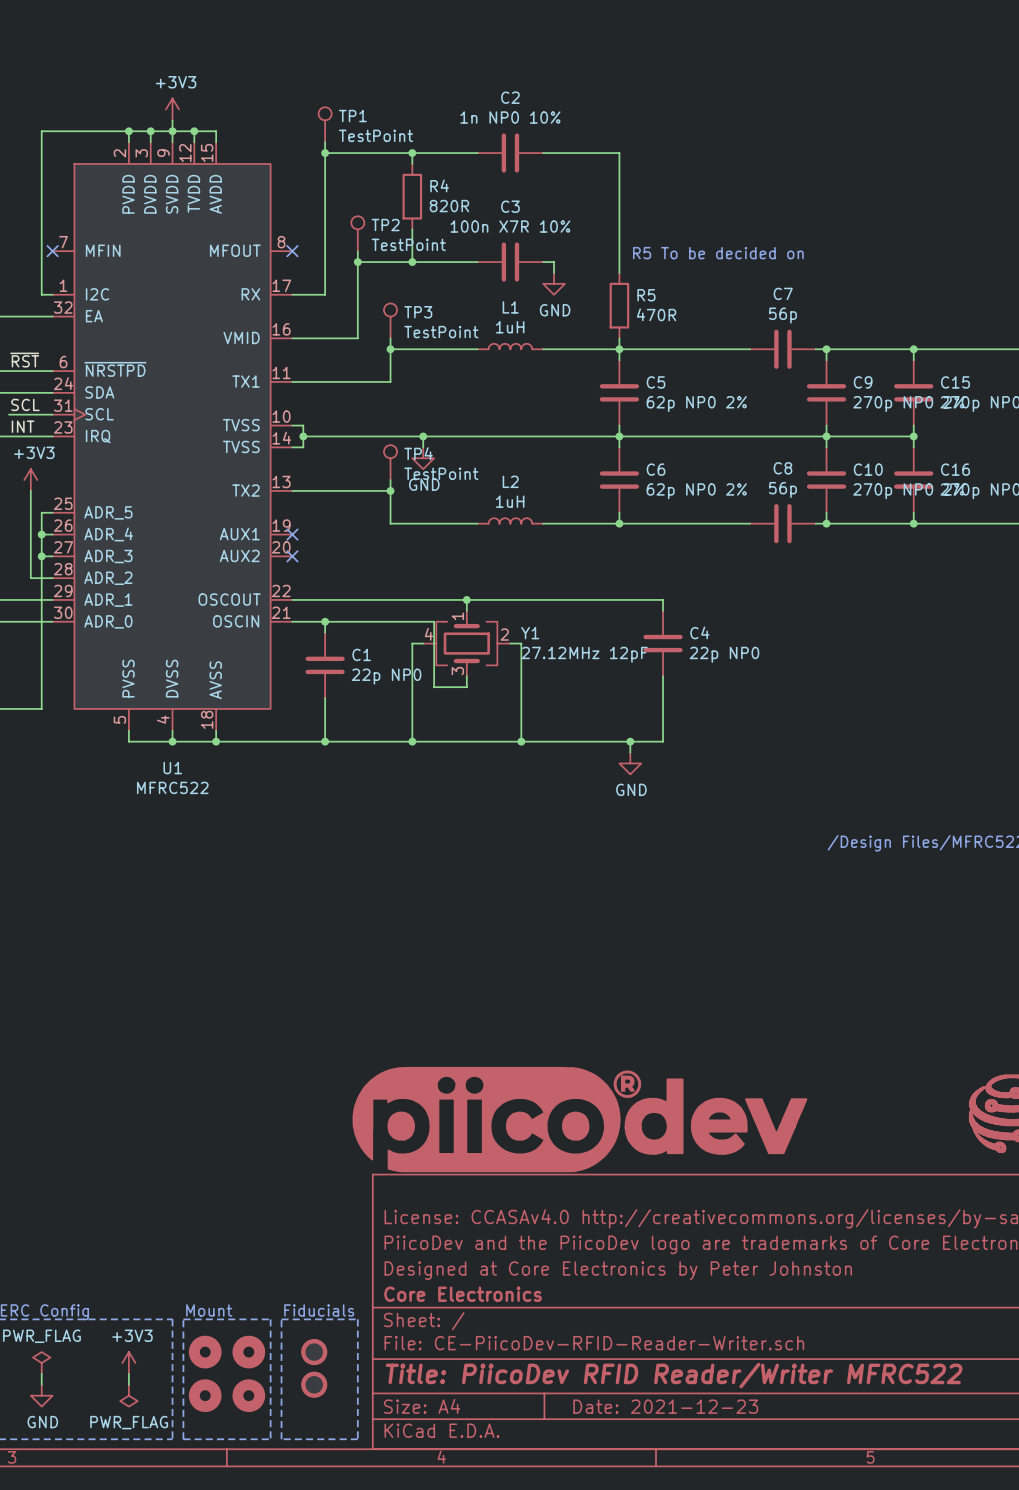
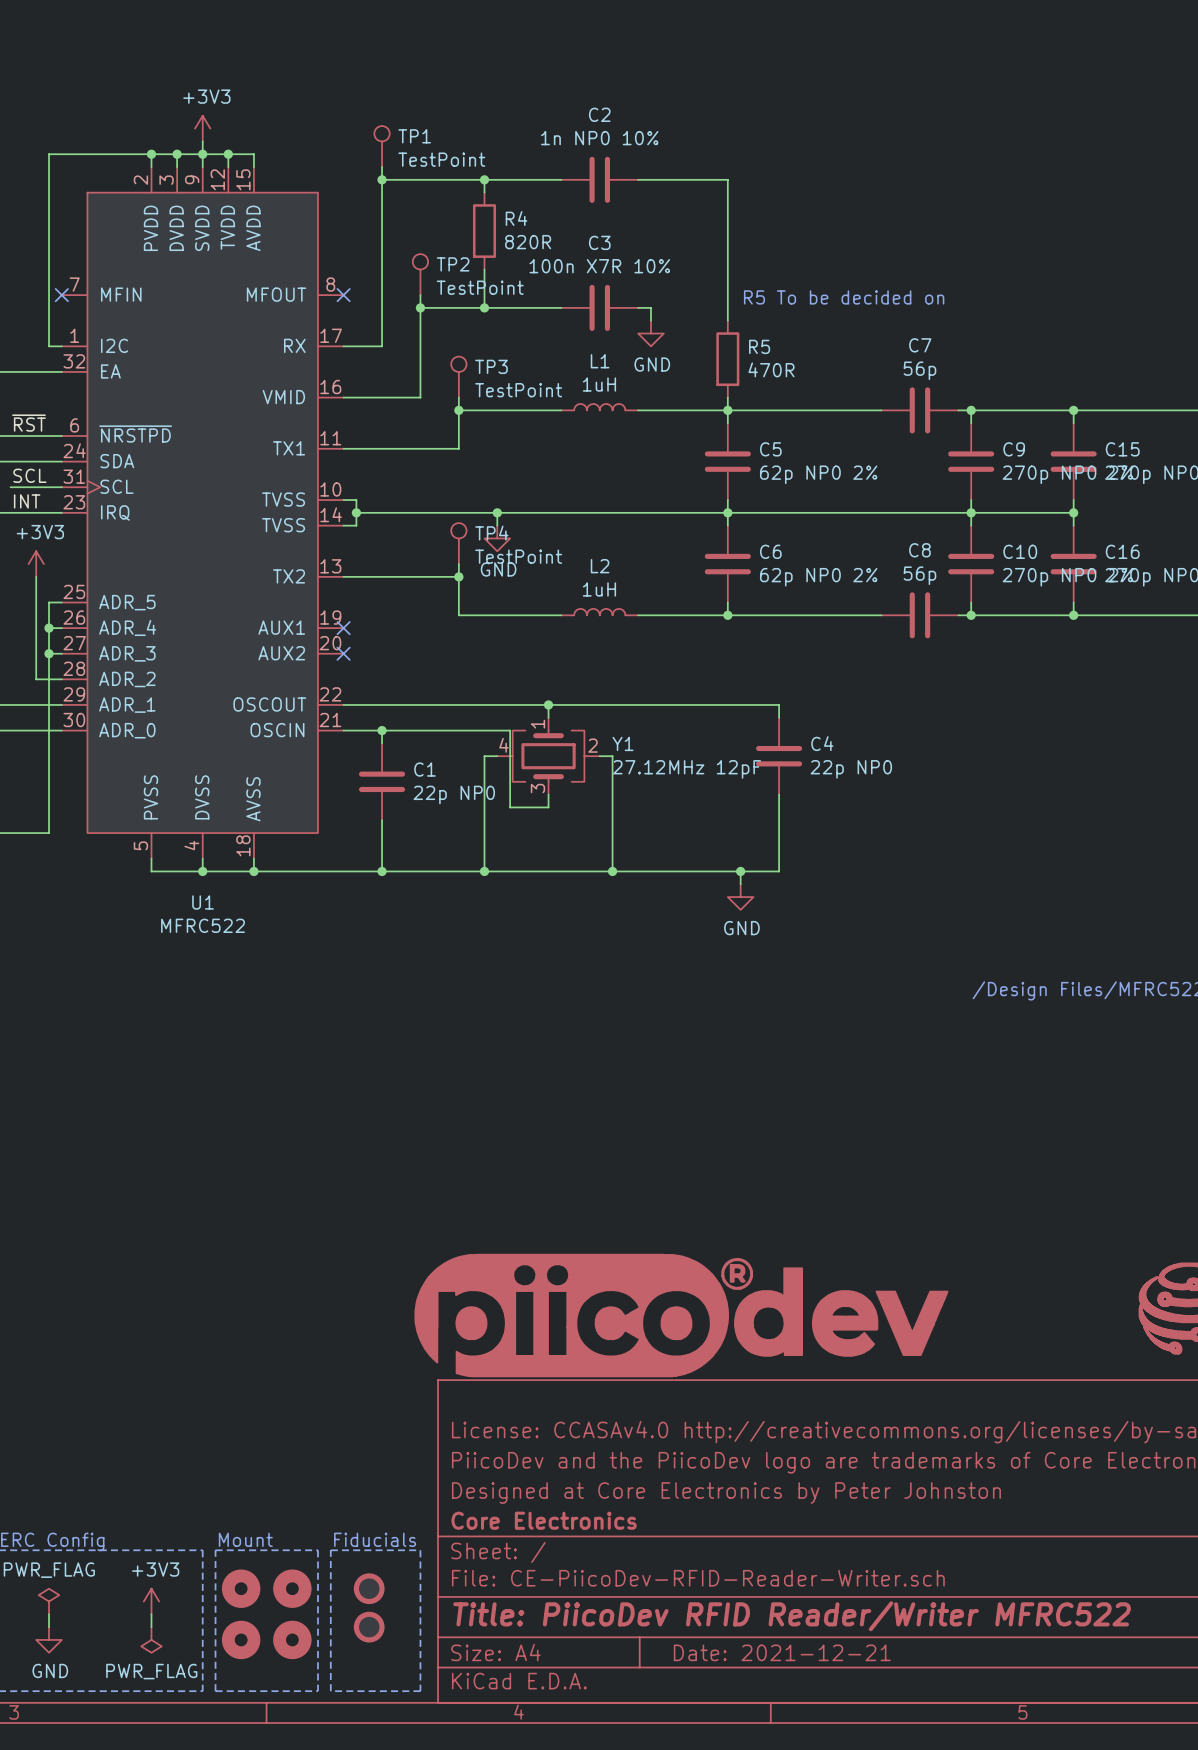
title block: Date: 2021-12-23 (665, 1406) -> Date: 2021-12-21 (782, 1652)

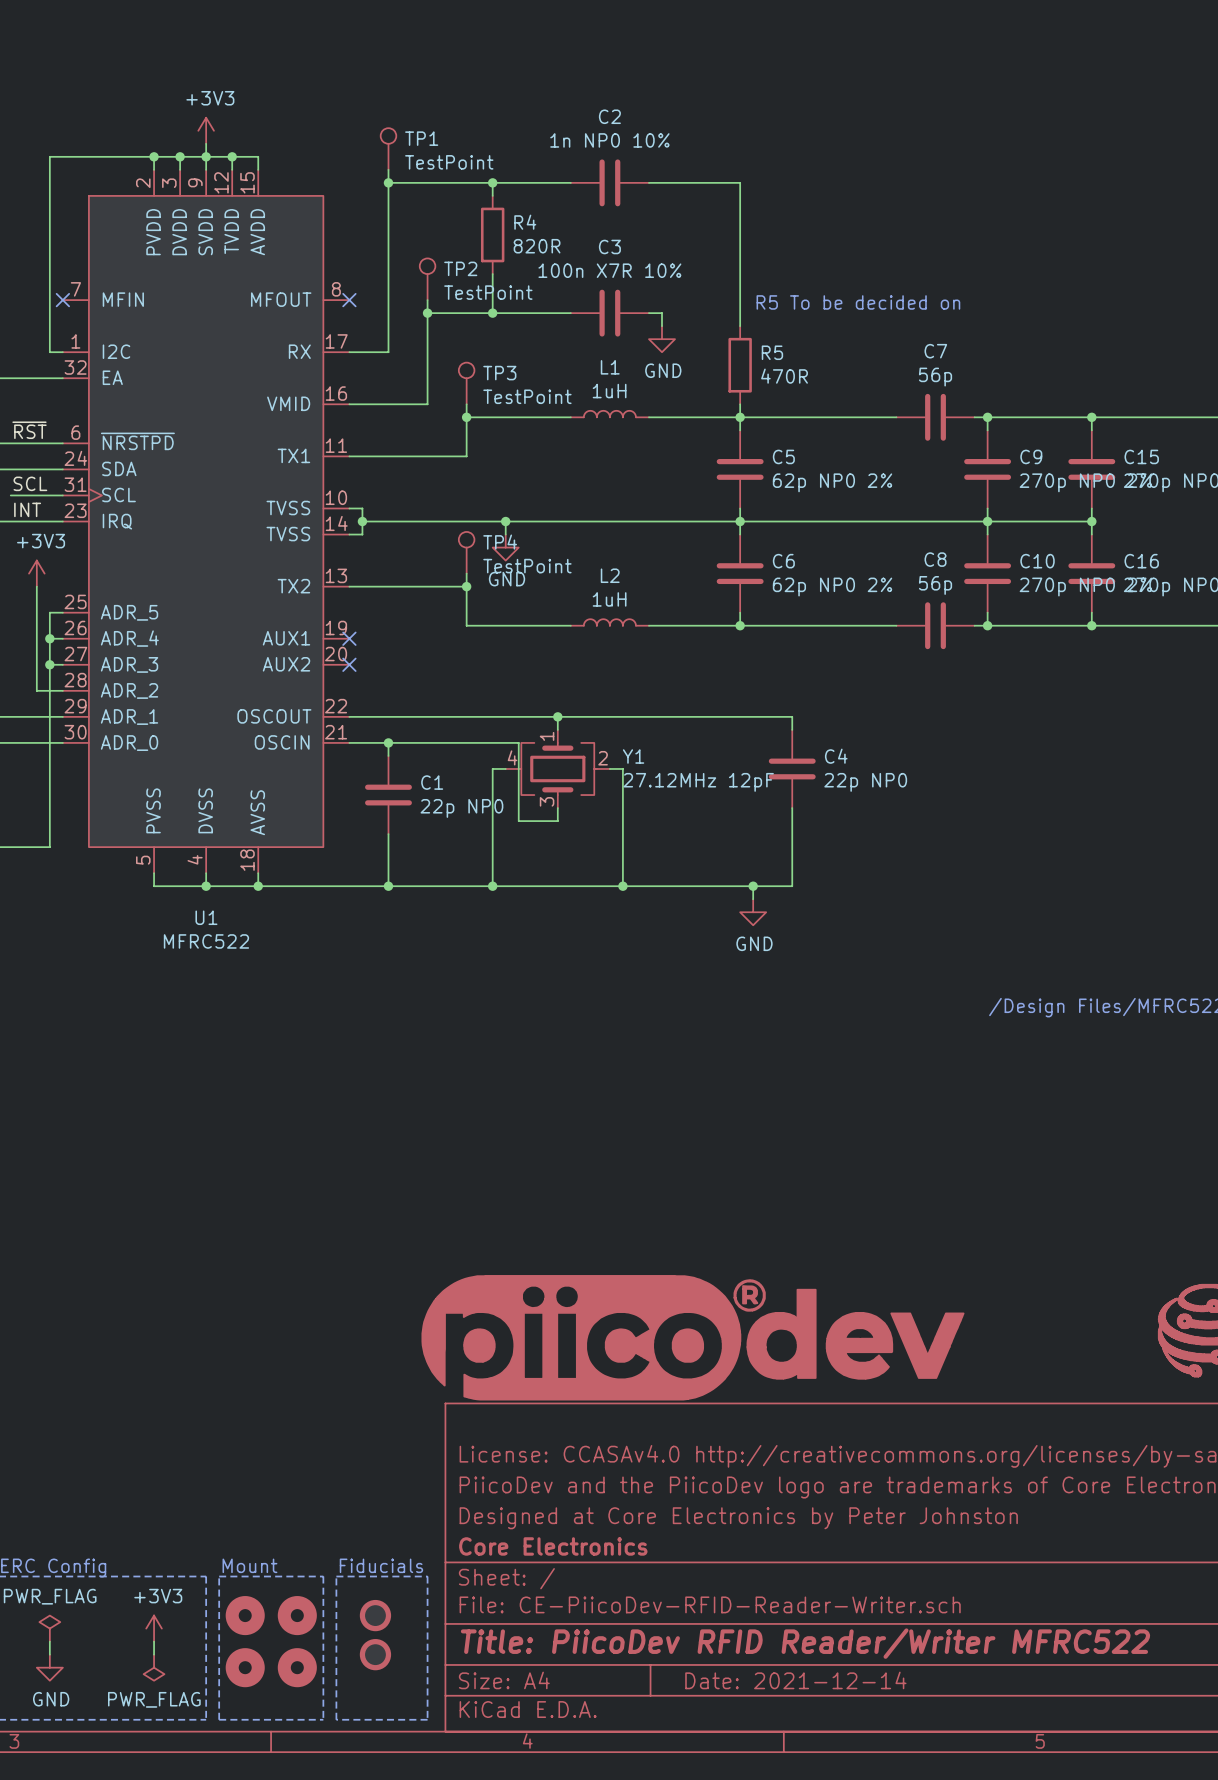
title block: Date: 2021-12-21 (782, 1652) -> Date: 2021-12-14 (795, 1680)

